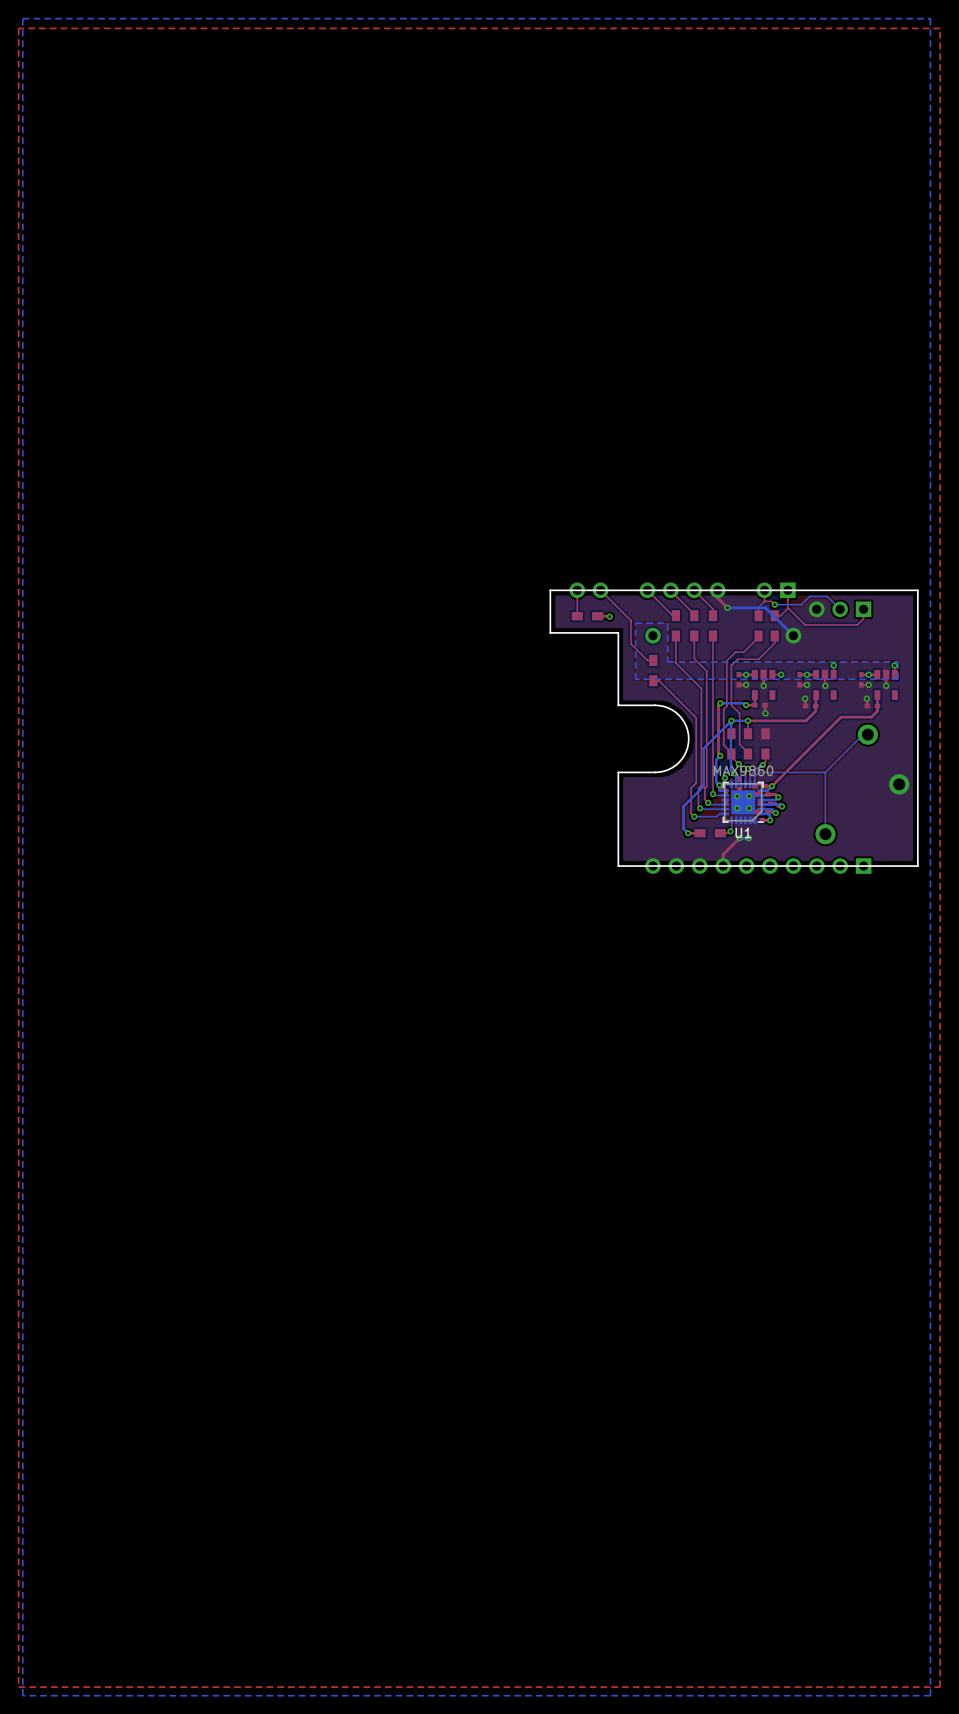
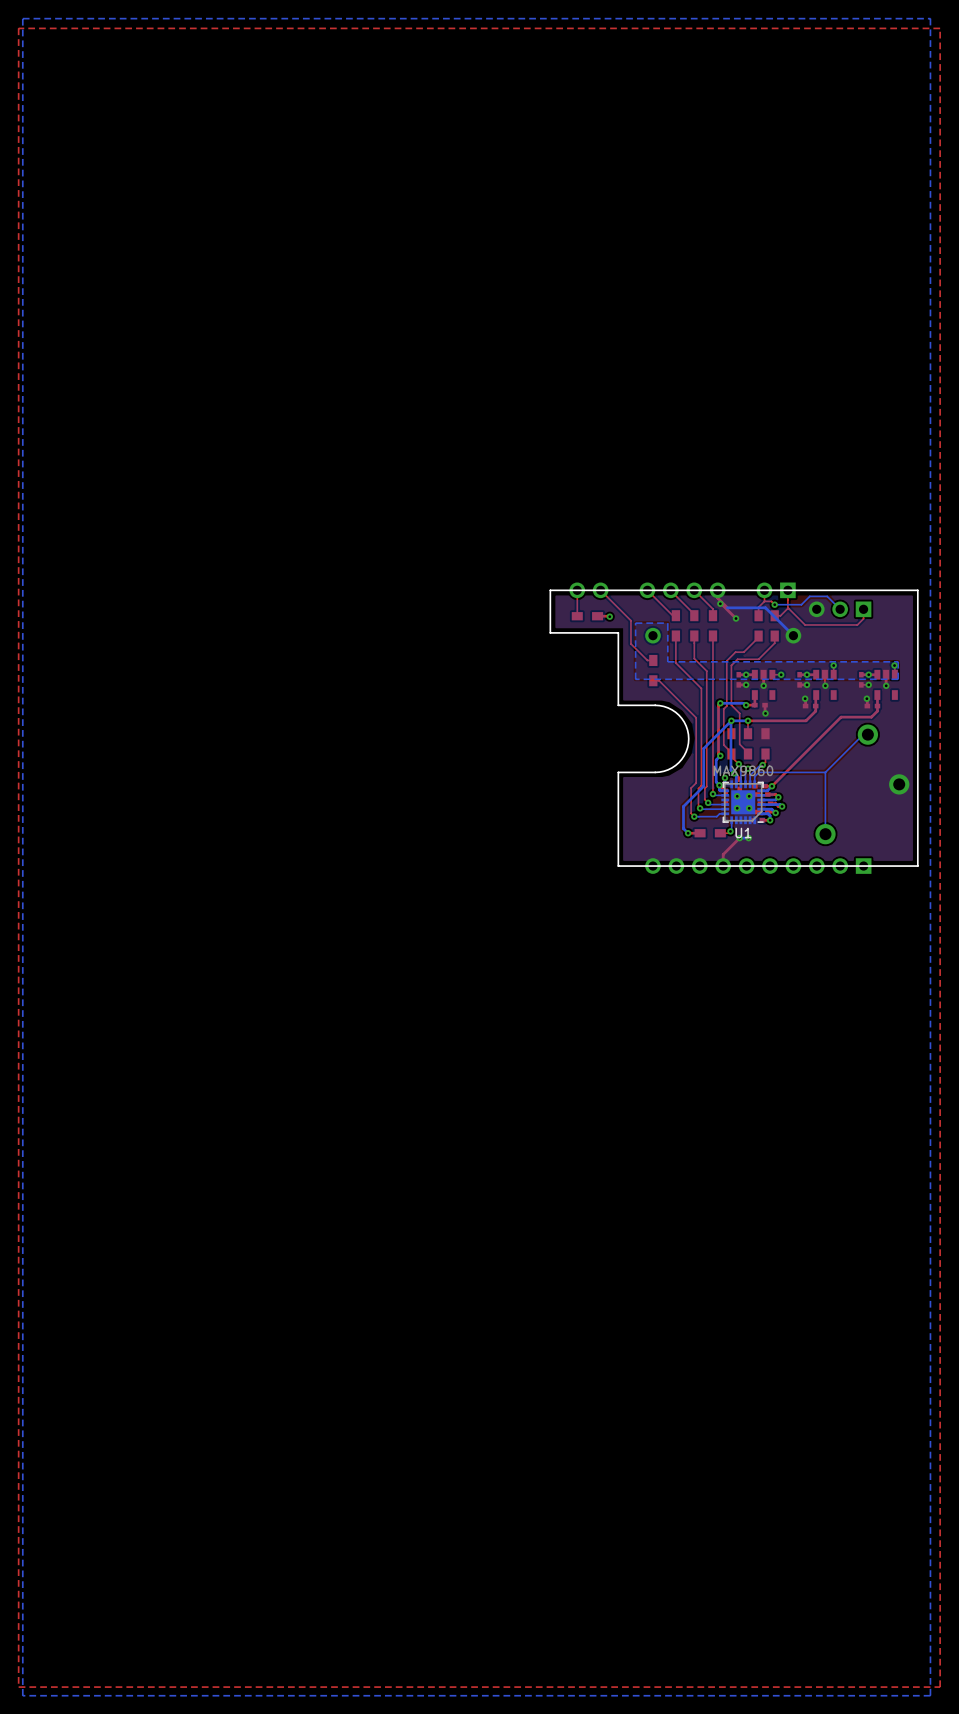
top track: none -> (720, 603) (736, 618)
via: none -> (720, 603)
via: (727, 607) -> none
via: none -> (736, 618)

